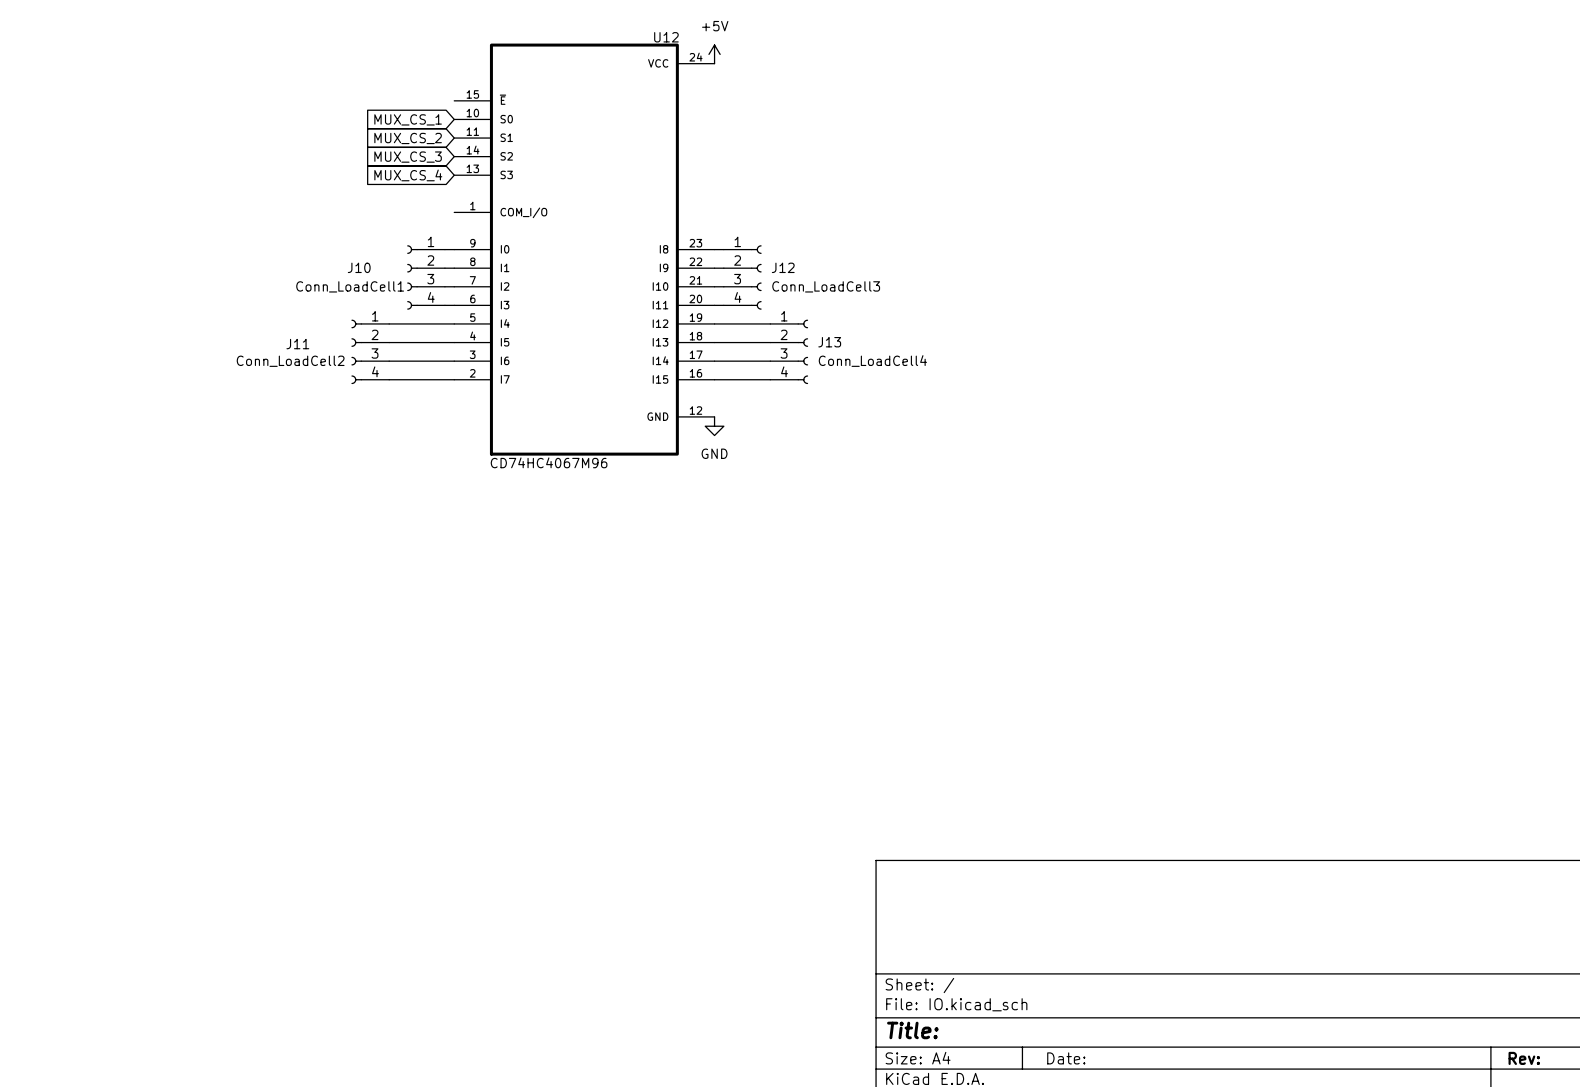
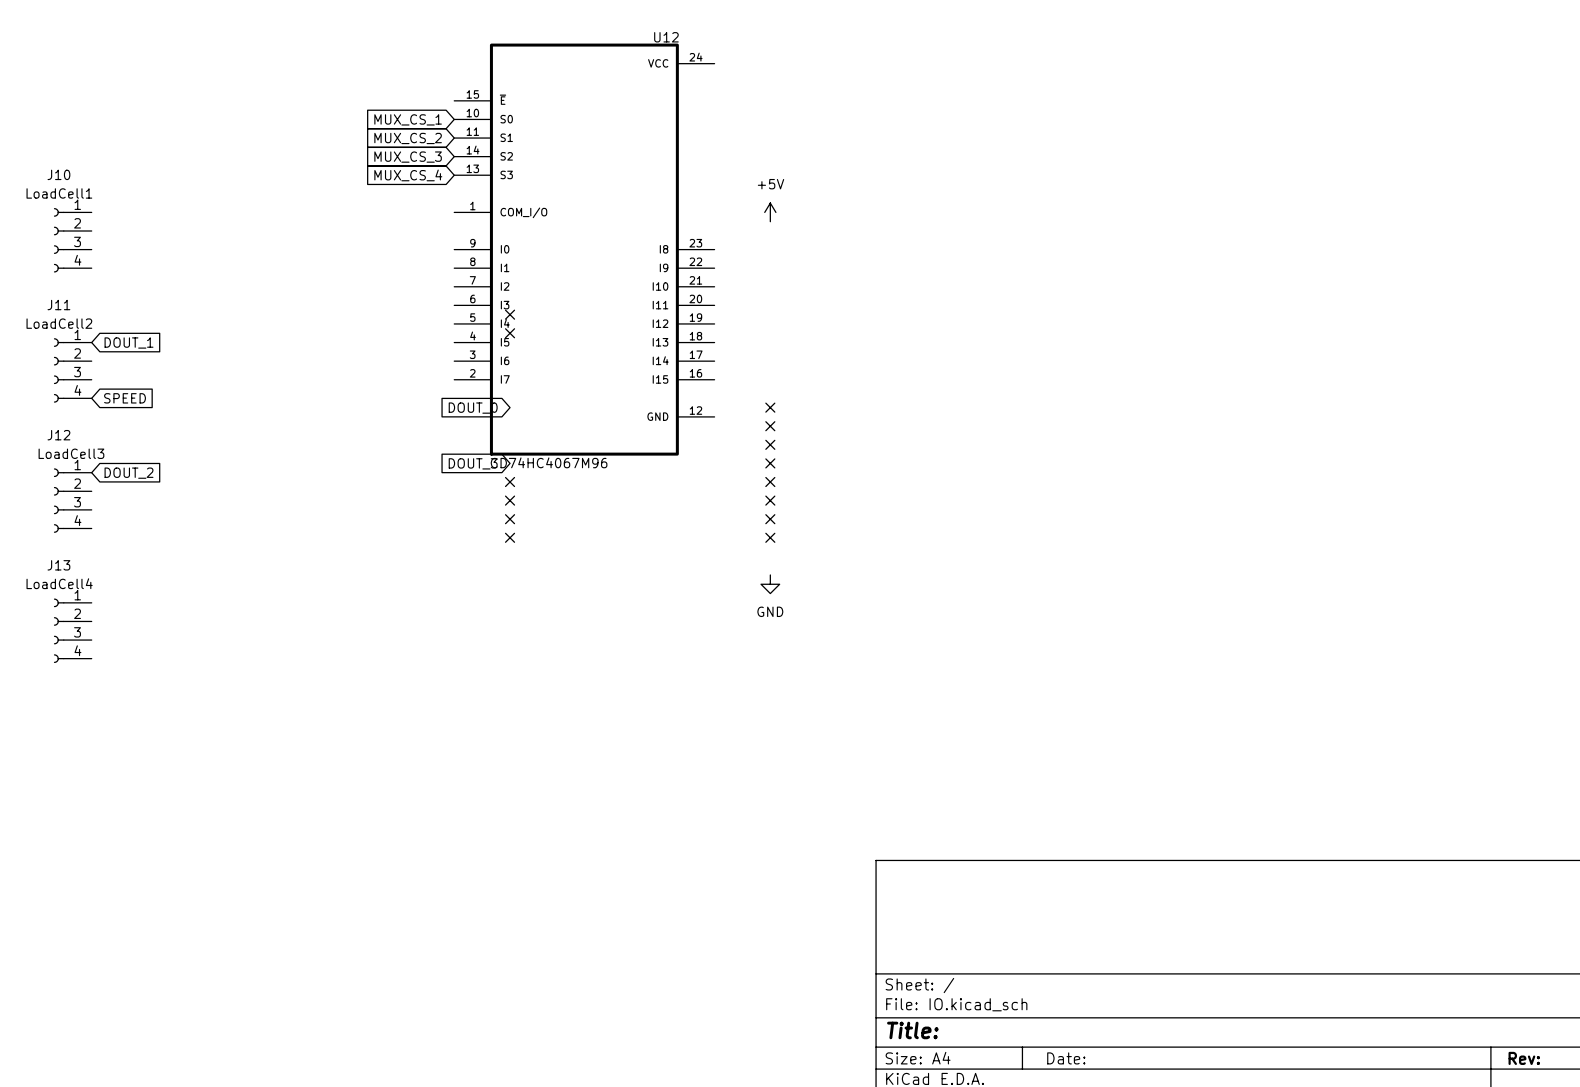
power symbol position: +5V (714, 54) -> +5V (770, 212)
wire: (444, 249) (454, 249) -> none
wire: (714, 249) (723, 249) -> none
J10 name position: J10 (359, 267) -> J10 (58, 174)
J12 name position: J12 (783, 267) -> J12 (58, 435)
wire: (444, 268) (454, 268) -> none
wire: (714, 268) (723, 268) -> none
J10 position: (426, 277) -> (72, 240)
J12 position: (742, 277) -> (72, 500)
J12 flip: as is (756, 277) -> left-right (59, 500)
J10 value: Conn_LoadCell1 (350, 286) -> LoadCell1 (59, 193)
wire: (444, 286) (454, 286) -> none
wire: (714, 286) (723, 286) -> none
J12 value: Conn_LoadCell3 (826, 286) -> LoadCell3 (71, 453)
wire: (444, 305) (454, 305) -> none
wire: (714, 305) (723, 305) -> none
no-connect mark: none -> (510, 314)
wire: (389, 323) (454, 323) -> none
wire: (714, 323) (770, 323) -> none
no-connect mark: none -> (510, 333)
wire: (389, 342) (454, 342) -> none
wire: (714, 342) (770, 342) -> none
J13 name position: J13 (829, 342) -> J13 (58, 565)
global label: none -> DOUT_1 (129, 343)
J11 name position: J11 (297, 344) -> J11 (58, 305)
J11 position: (370, 351) -> (72, 370)
J13 position: (789, 351) -> (72, 630)
J13 flip: as is (802, 351) -> left-right (59, 630)
J11 value: Conn_LoadCell2 (290, 361) -> LoadCell2 (59, 323)
wire: (389, 361) (454, 361) -> none
wire: (714, 361) (770, 361) -> none
J13 value: Conn_LoadCell4 (872, 361) -> LoadCell4 (59, 583)
wire: (389, 379) (454, 379) -> none
wire: (714, 379) (770, 379) -> none
global label: none -> SPEED (125, 398)
no-connect mark: none -> (770, 407)
global label: none -> DOUT_0 (473, 408)
power symbol position: GND (714, 426) -> GND (770, 584)
no-connect mark: none -> (770, 426)
no-connect mark: none -> (770, 444)
global label: none -> DOUT_3 (473, 463)
no-connect mark: none -> (770, 463)
global label: none -> DOUT_2 (129, 473)
no-connect mark: none -> (510, 482)
no-connect mark: none -> (770, 482)
no-connect mark: none -> (510, 500)
no-connect mark: none -> (770, 500)
no-connect mark: none -> (510, 519)
no-connect mark: none -> (770, 519)
no-connect mark: none -> (510, 537)
no-connect mark: none -> (770, 537)

